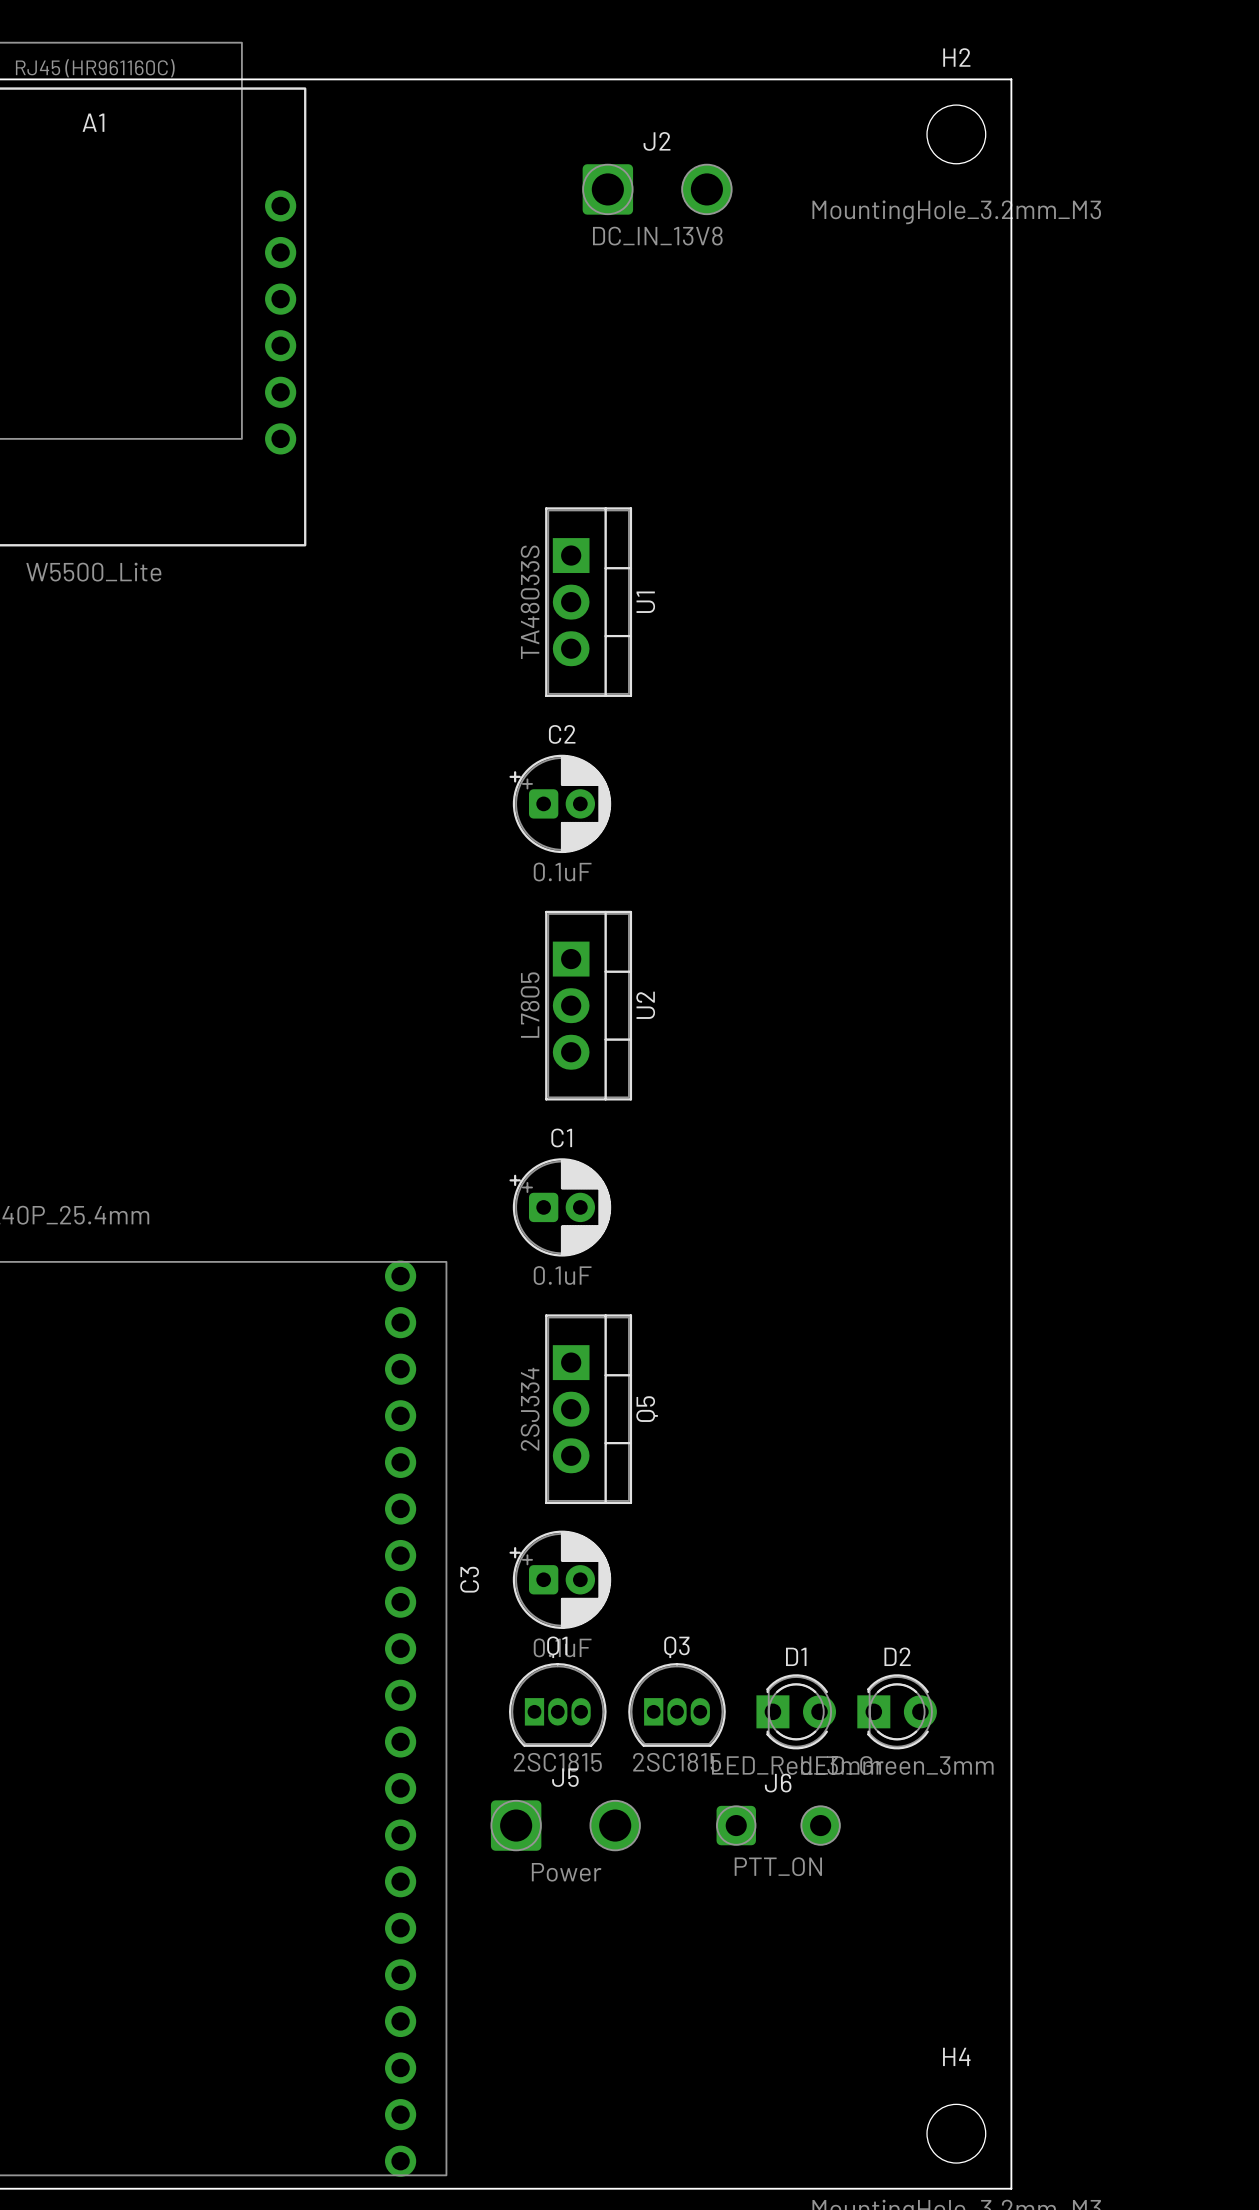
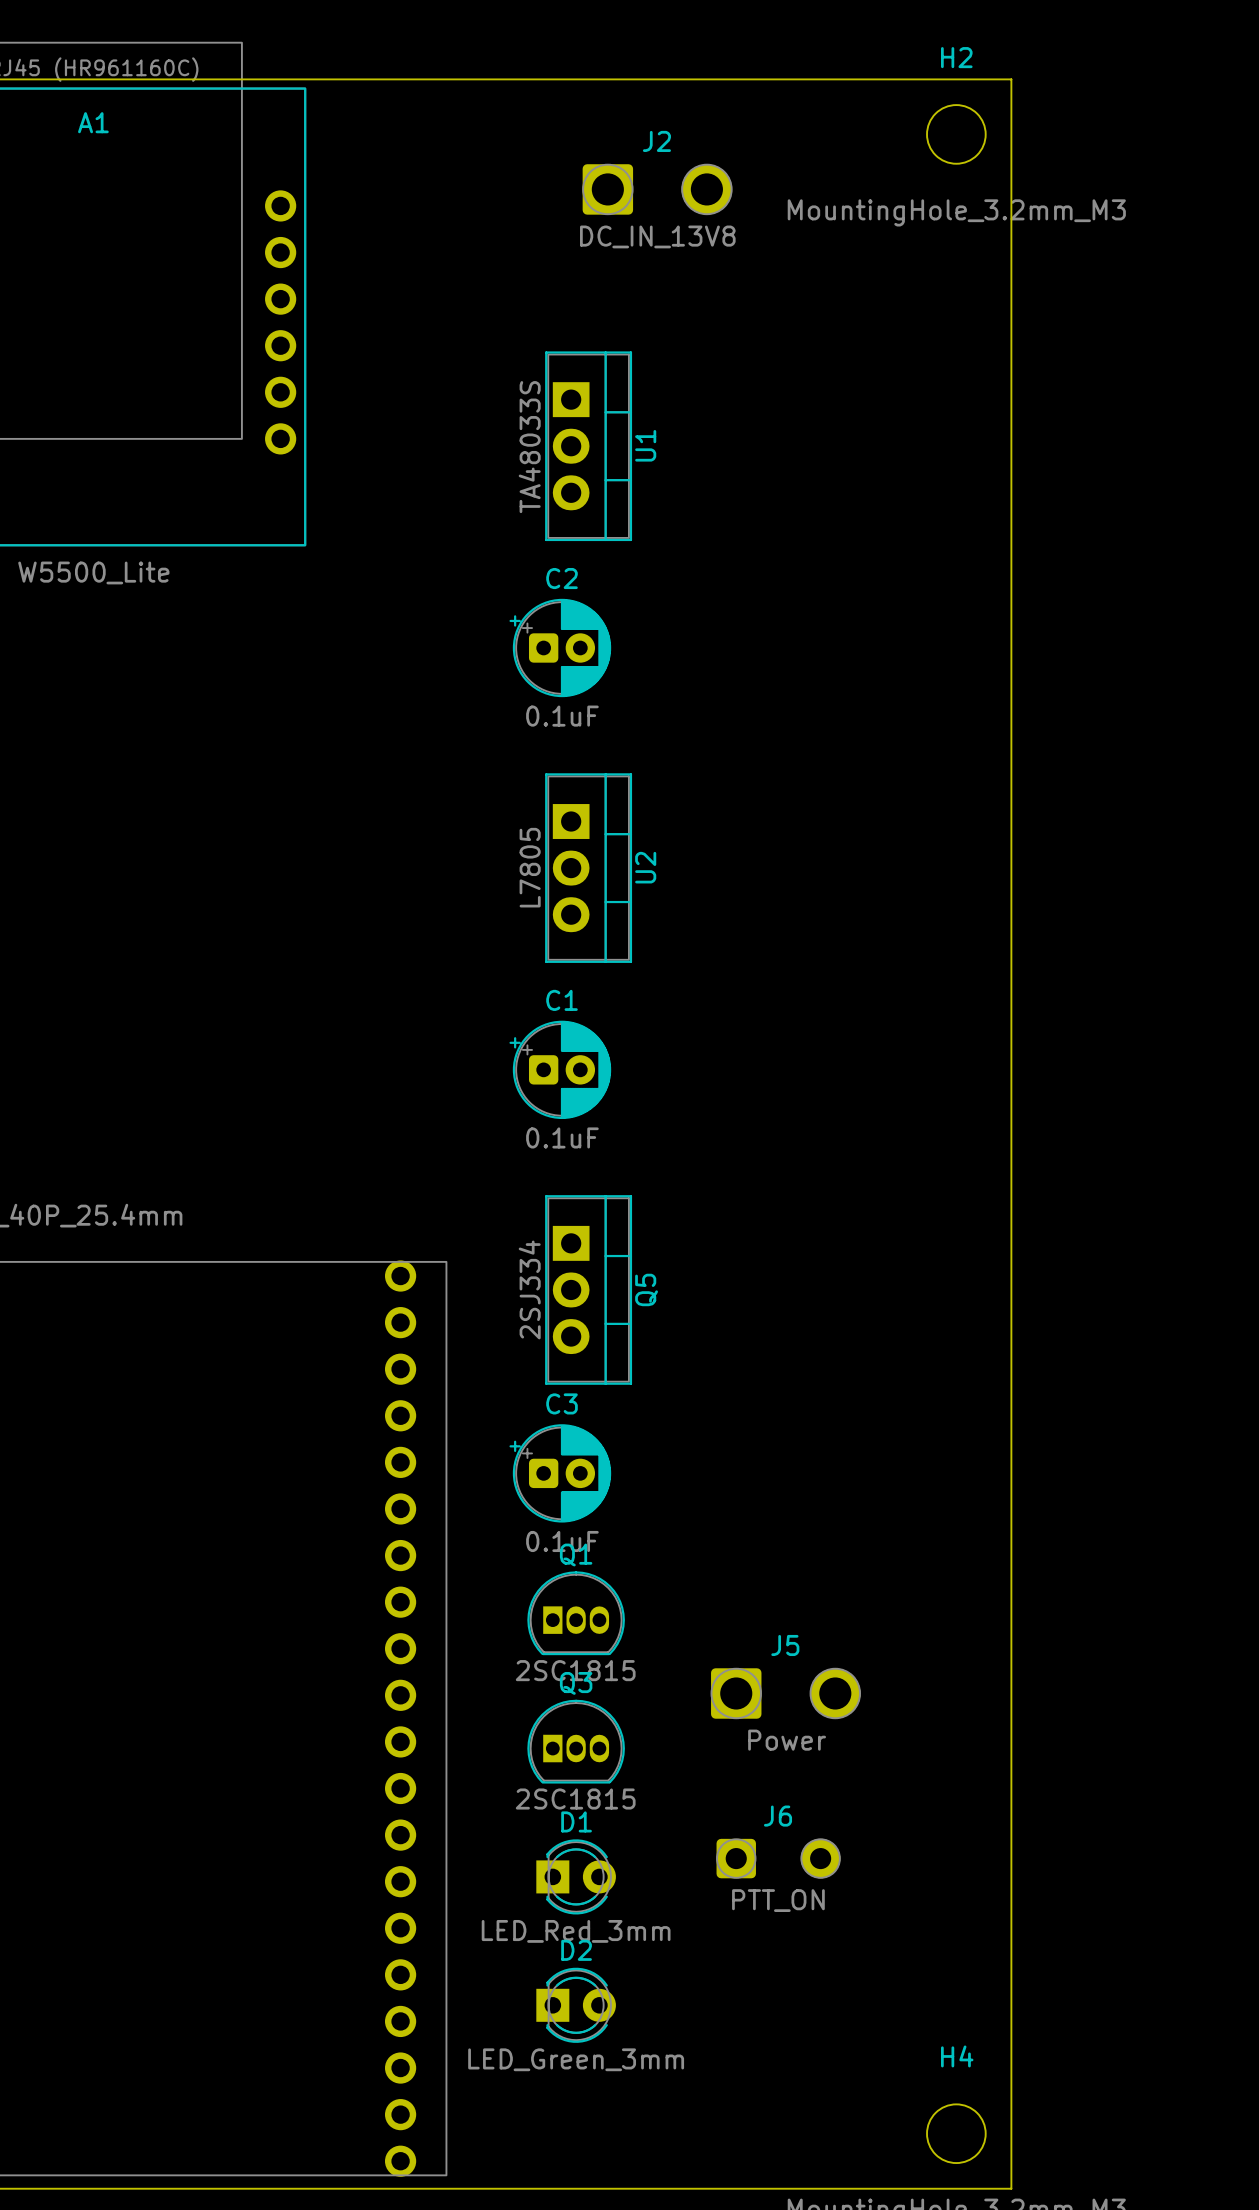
U1 position: (588, 602) -> (588, 446)
C2 position: (560, 803) -> (560, 647)
U2 position: (588, 1005) -> (588, 868)
C1 position: (560, 1207) -> (560, 1069)
Q5 position: (588, 1409) -> (588, 1289)
C3 name rotation: 0° (469, 1579) -> 90° clockwise (562, 1403)
C3 name position: C3 (469, 1579) -> C3 (562, 1403)
C3 position: (560, 1579) -> (560, 1473)
Q1 position: (557, 1704) -> (576, 1613)
Q3 position: (677, 1704) -> (576, 1741)
D1 position: (796, 1711) -> (576, 1876)
D2 position: (897, 1711) -> (576, 2005)
J5 position: (565, 1825) -> (785, 1693)
J6 position: (778, 1825) -> (778, 1858)

